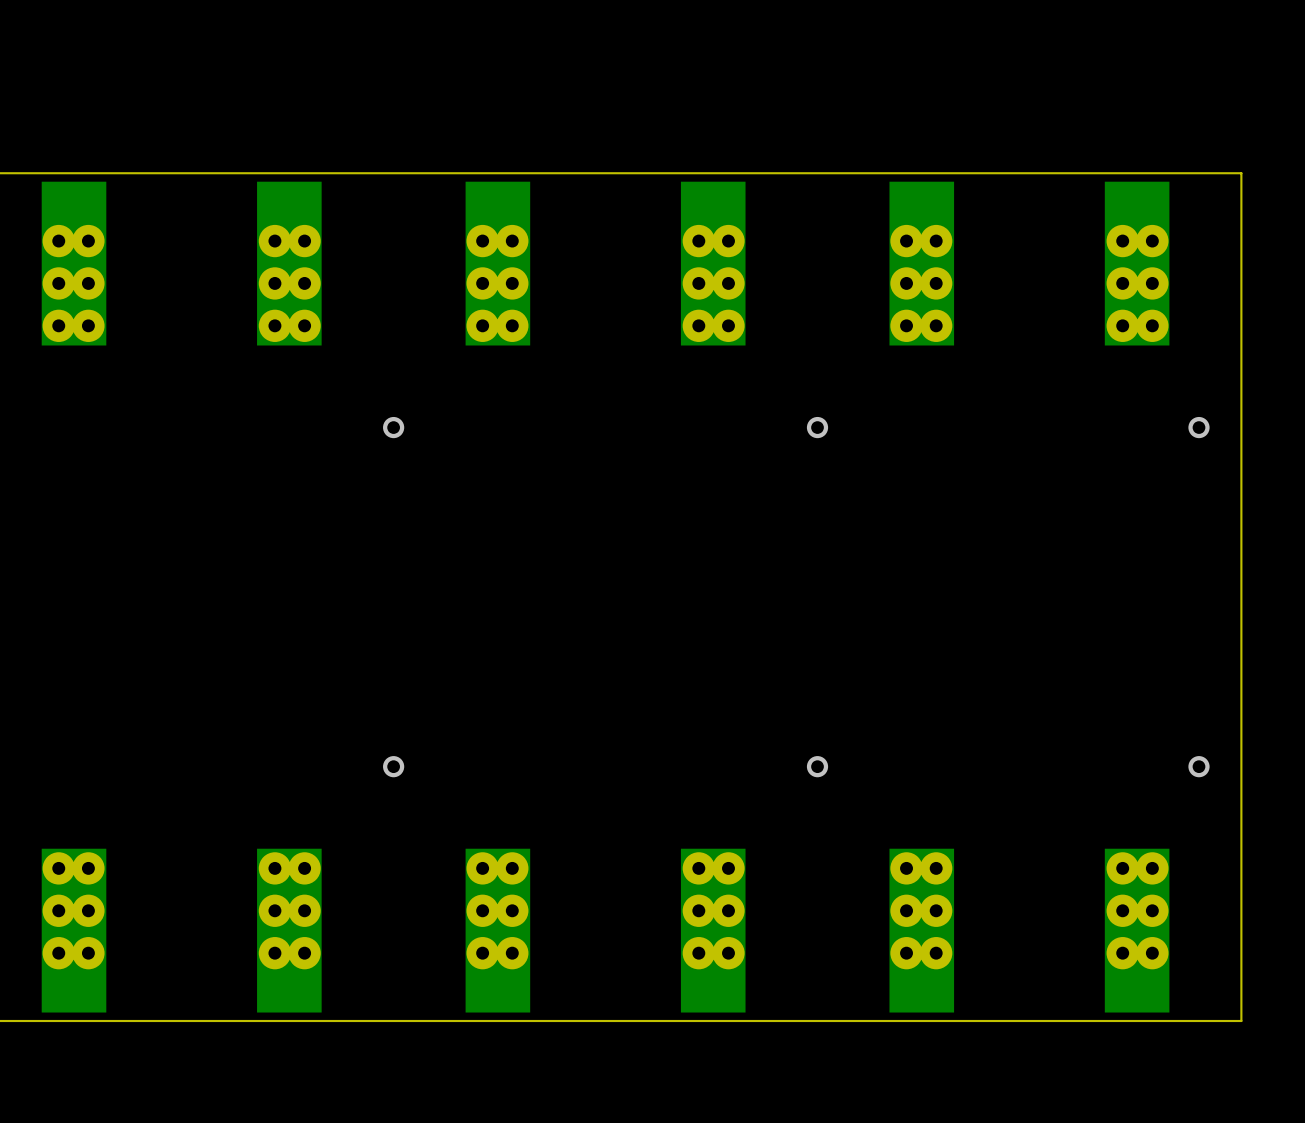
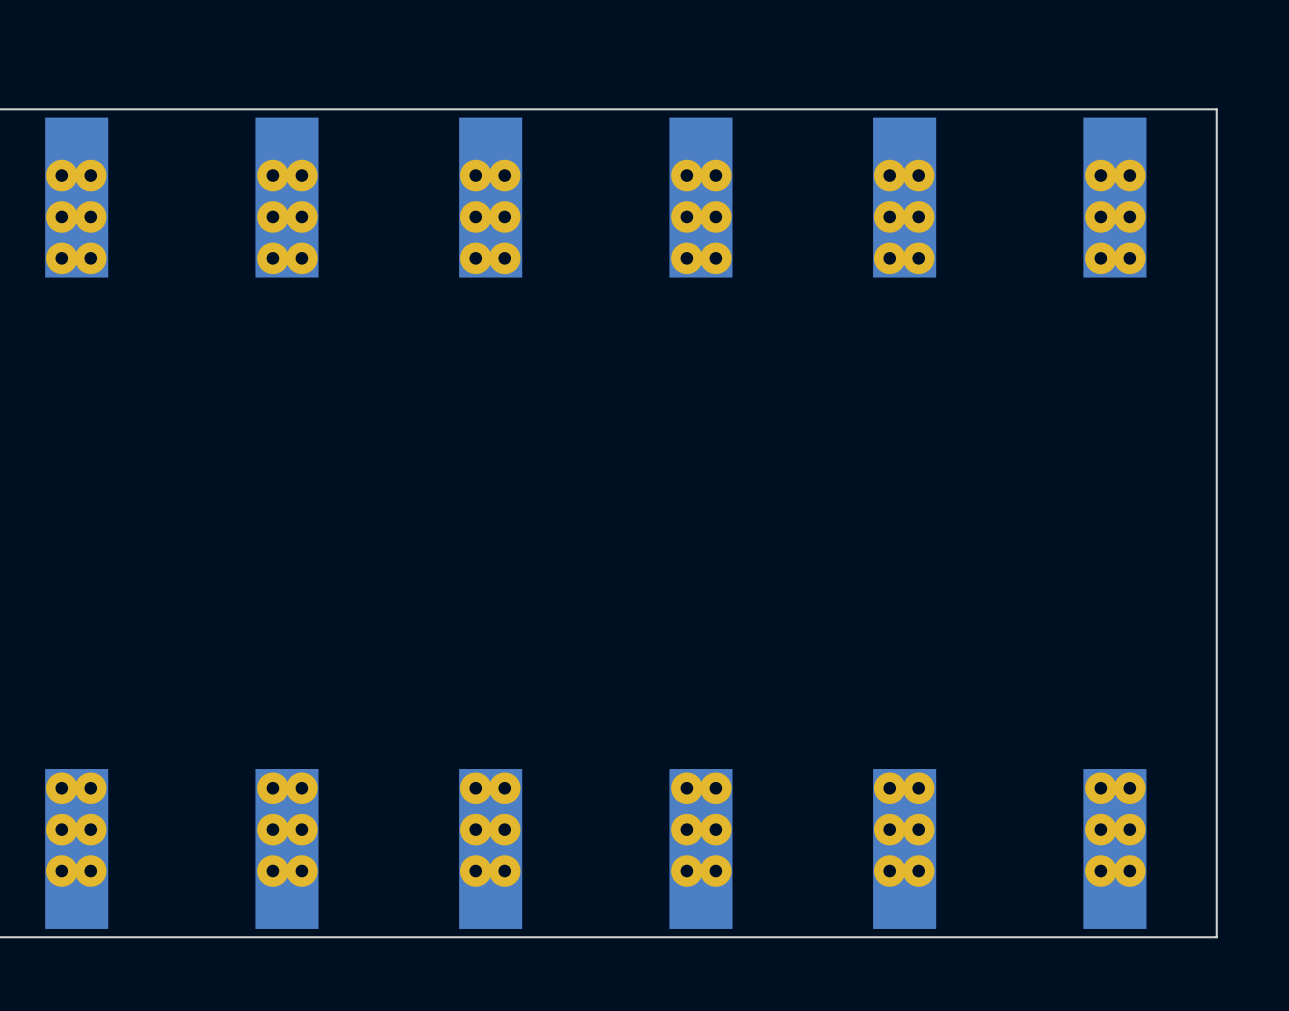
via: (393, 427) -> none
via: (817, 427) -> none
via: (1199, 427) -> none
via: (393, 766) -> none
via: (817, 766) -> none
via: (1199, 766) -> none

